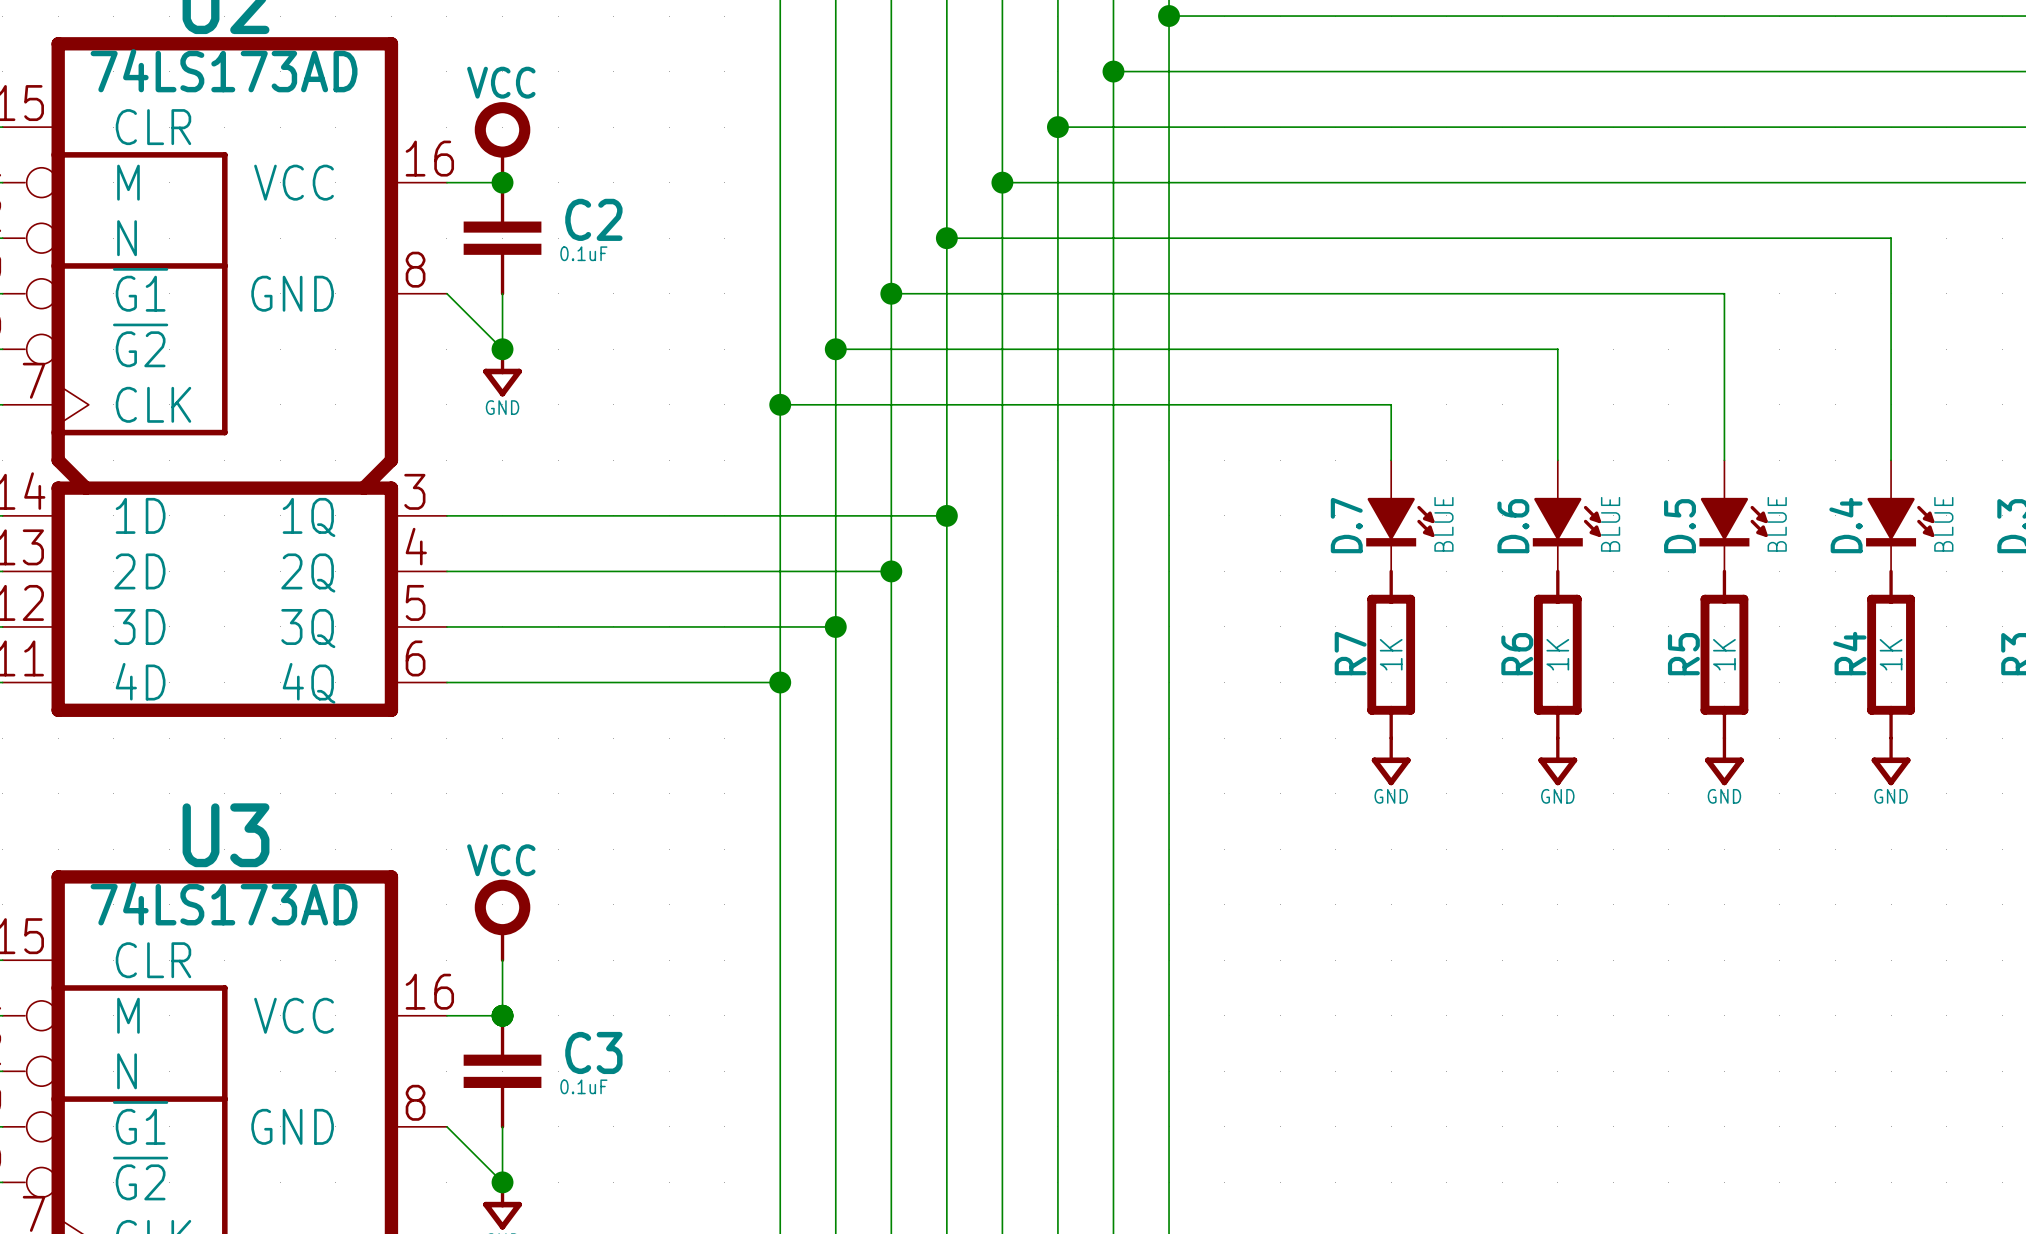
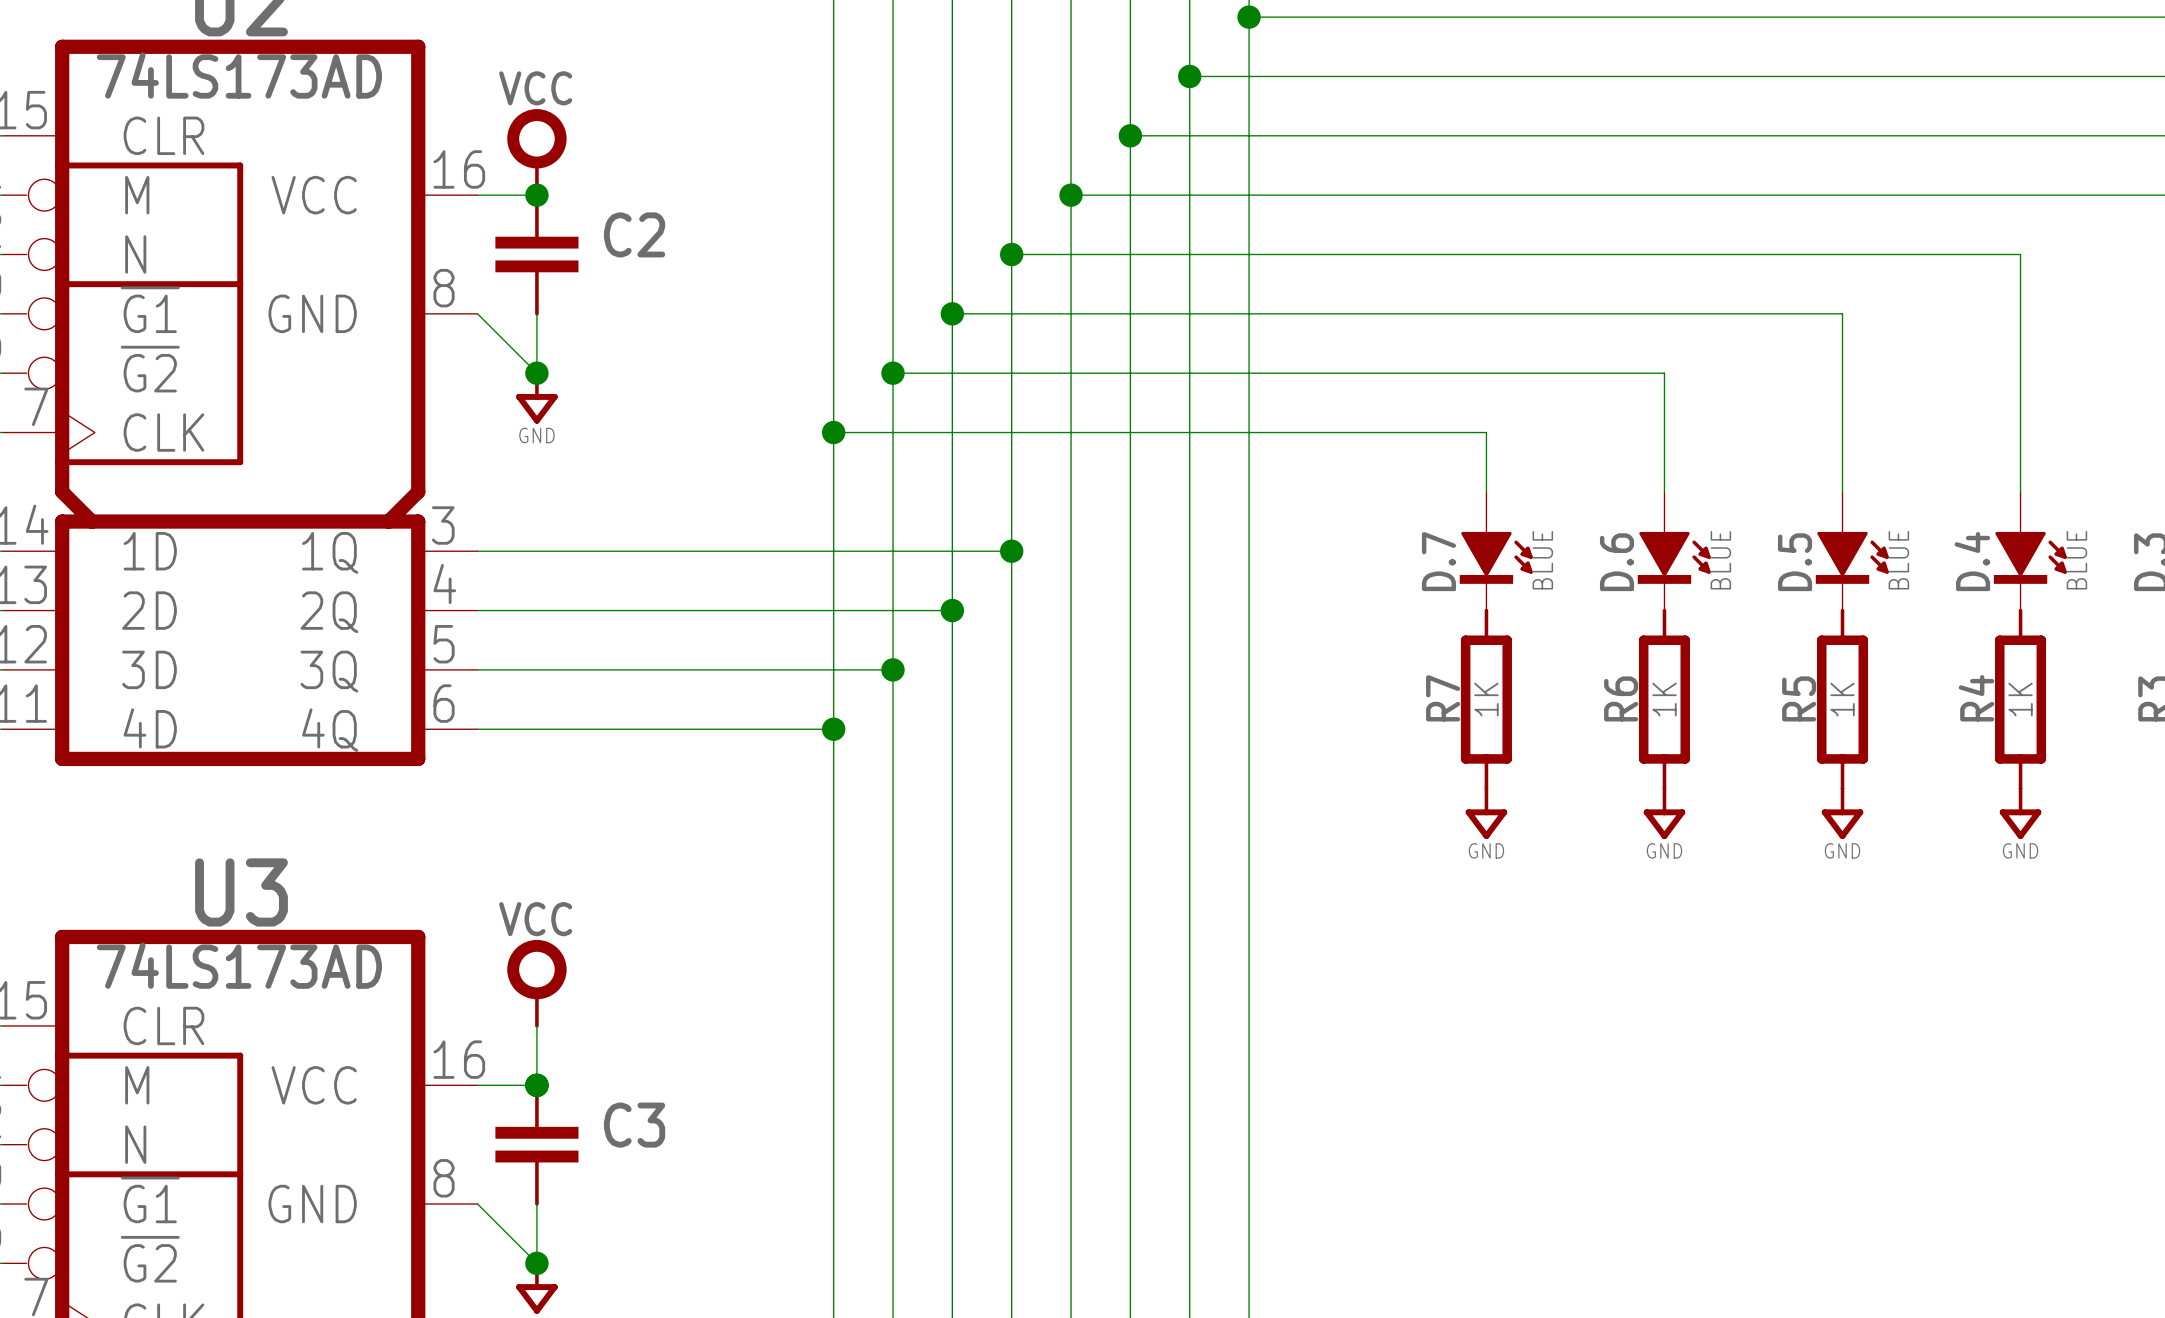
C2 value: 0.1uF (583, 253) -> none
C3 value: 0.1uF (583, 1086) -> none

